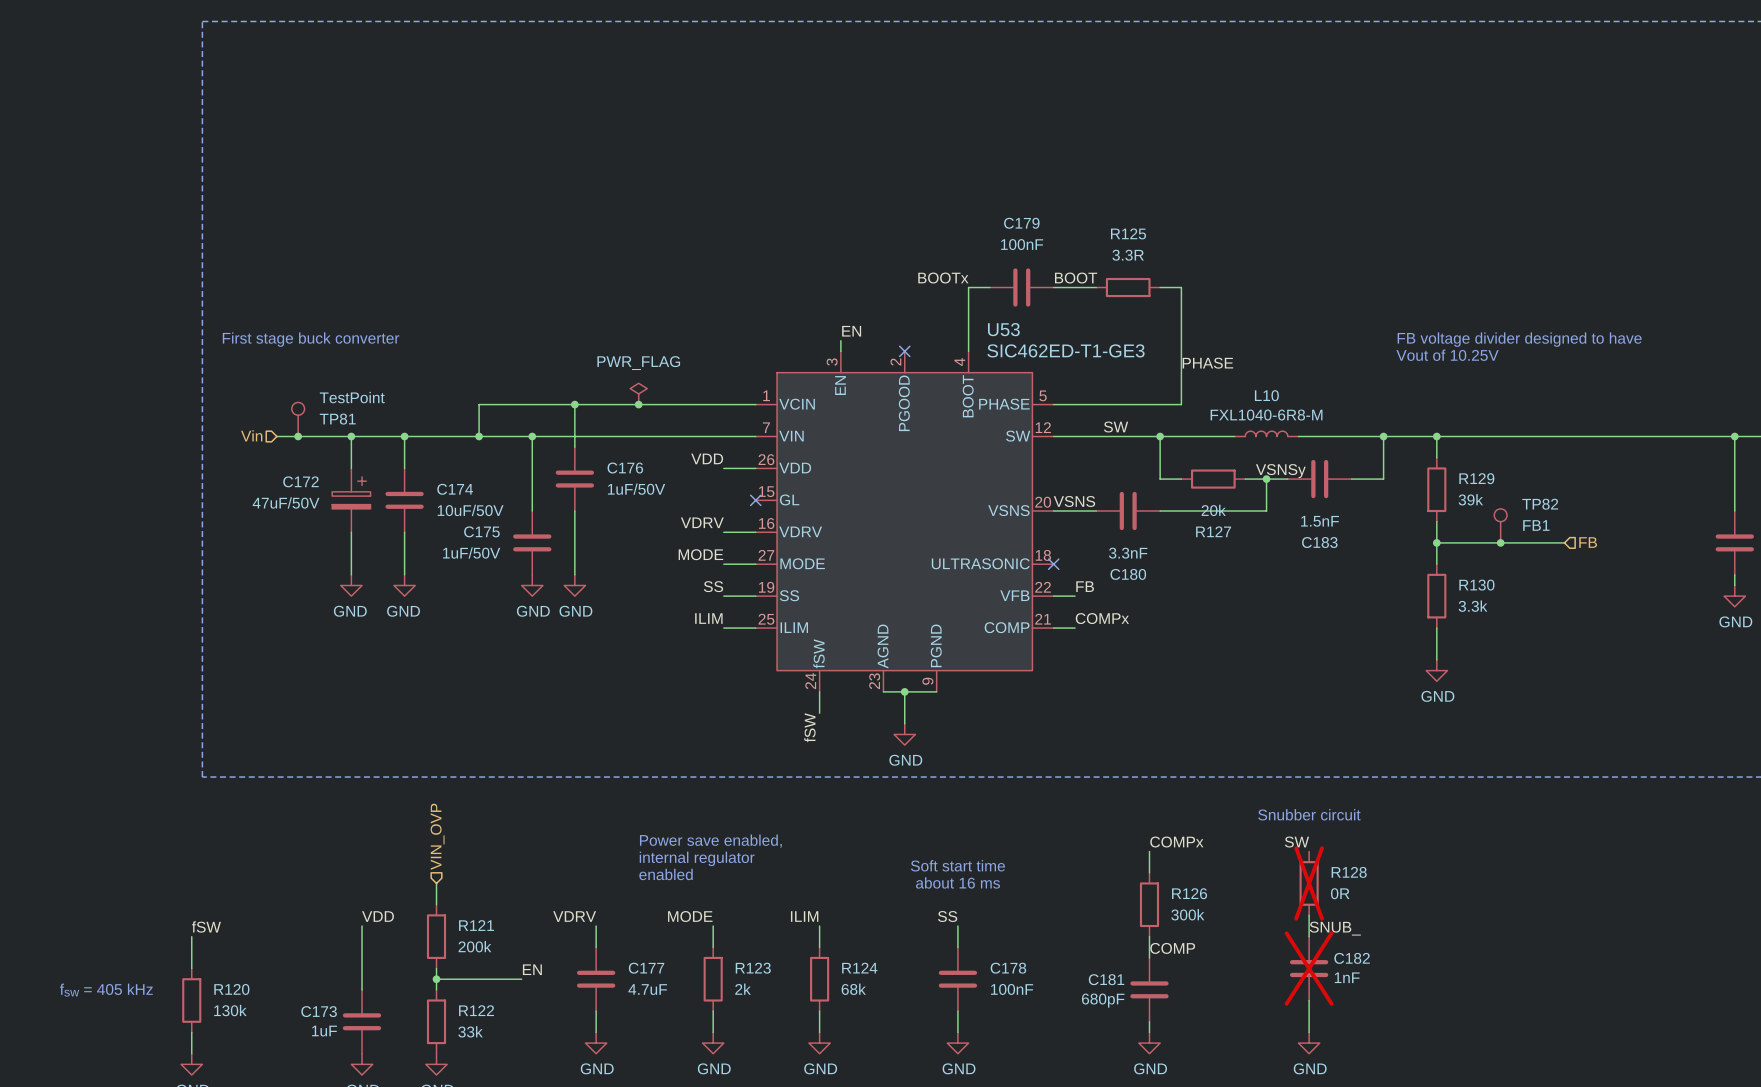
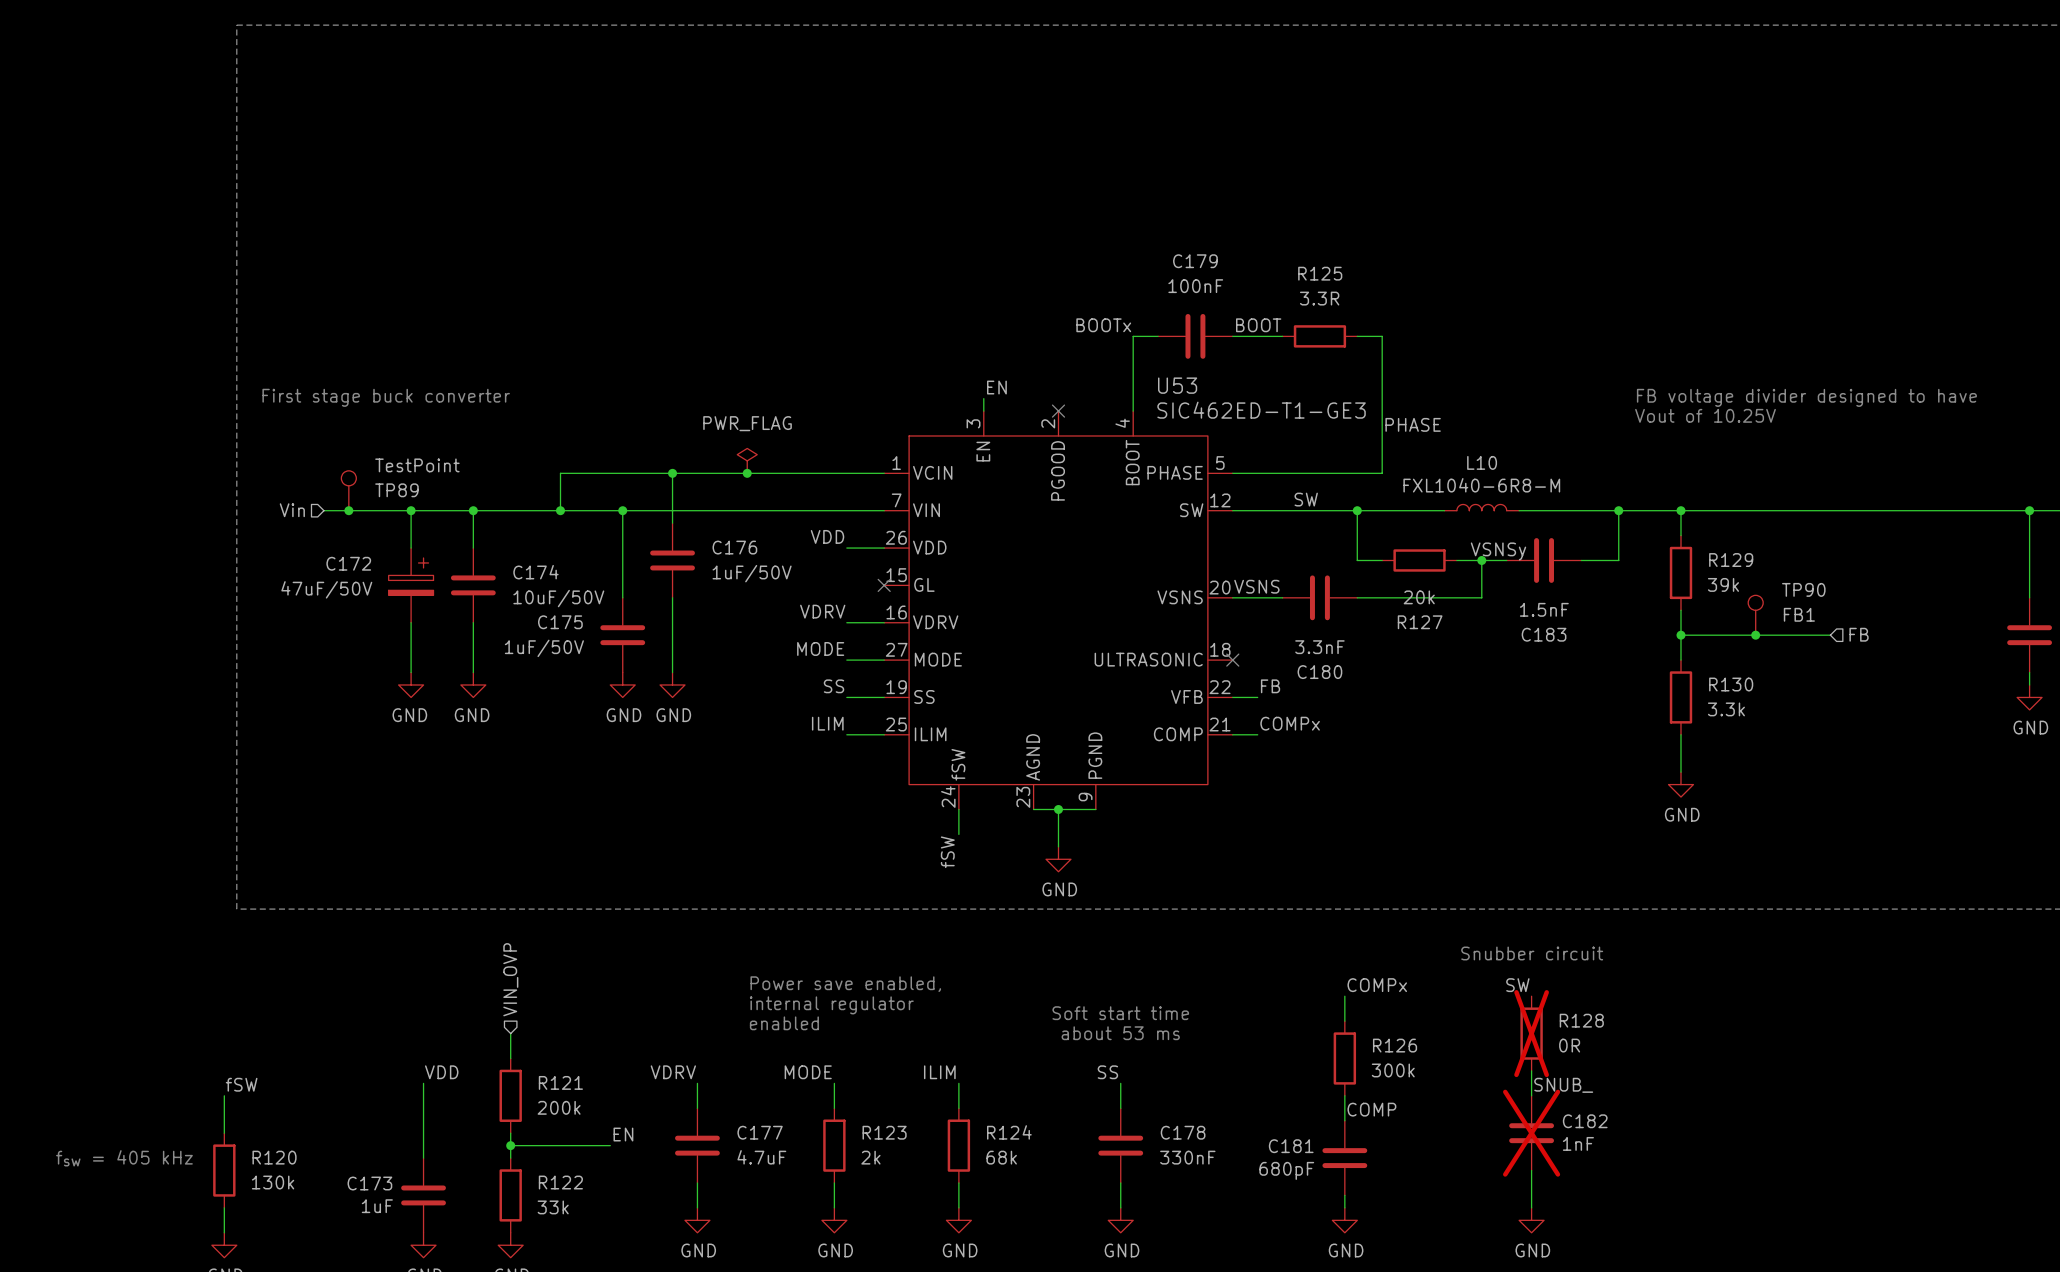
TP81 name: TP81 (337, 419) -> TP89 (396, 490)
TP82 name: TP82 (1540, 504) -> TP90 (1803, 589)
text: about 16 ms (957, 882) -> about 53 ms (1120, 1033)
C178 value: 100nF (1012, 989) -> 330nF (1187, 1157)

